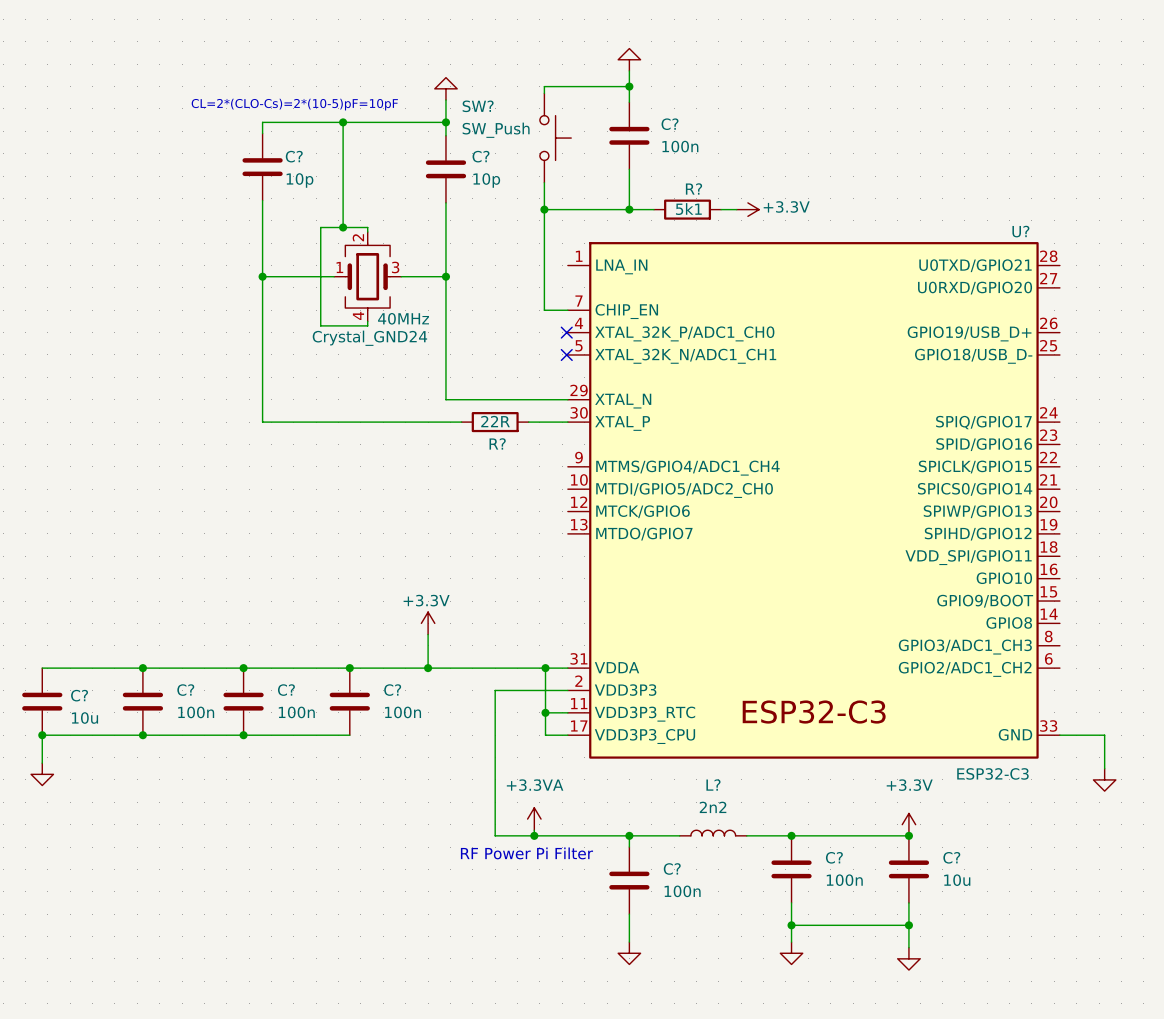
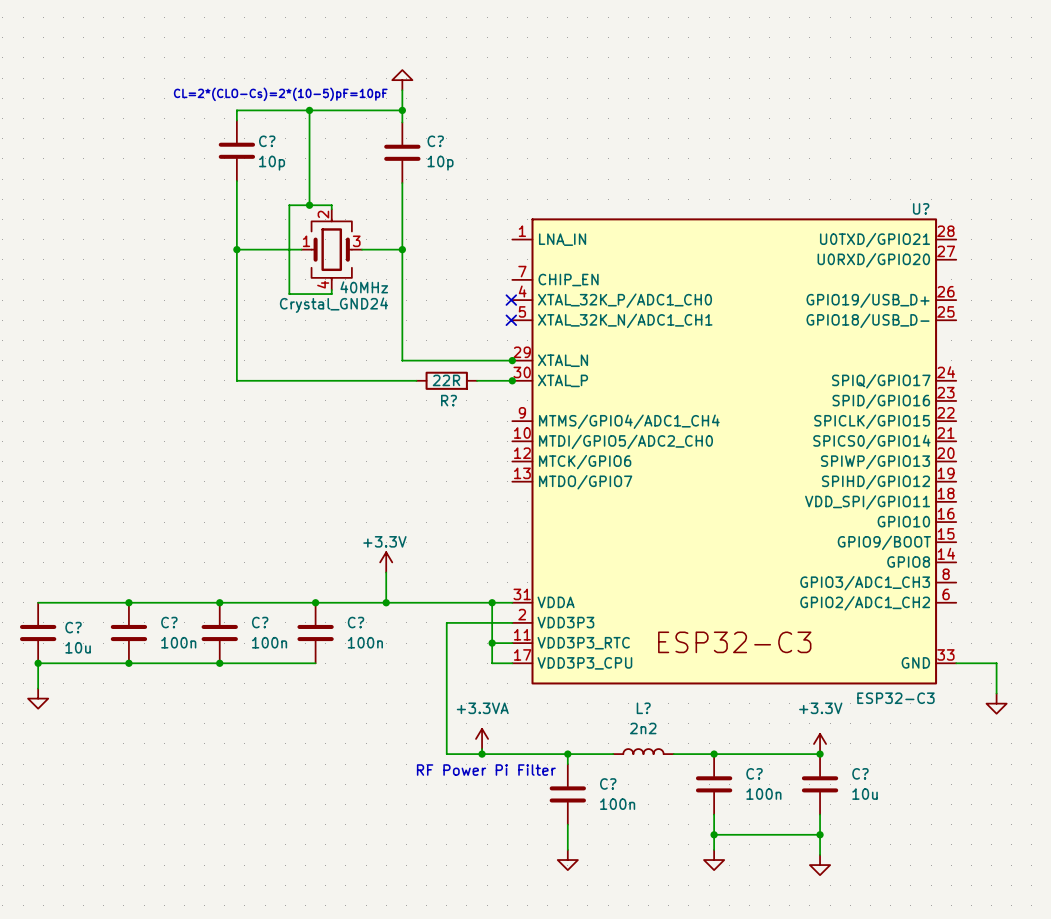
power symbol: (629, 59) -> none
wire: (629, 70) (629, 102) -> none
wire: (629, 86) (544, 86) (544, 93) -> none
junction: (629, 86) -> none
C?: 100n (629, 135) -> none
SW?: SW_Push (555, 138) -> none
wire: (629, 169) (629, 209) -> none
wire: (544, 182) (544, 310) (567, 310) -> none
wire: (544, 209) (653, 209) -> none
junction: (544, 209) -> none
junction: (629, 209) -> none
R?: 5k1 (687, 209) -> none
wire: (721, 209) (736, 209) -> none
power symbol: +3.3V (747, 209) -> none
junction: none -> (512, 360)
junction: none -> (512, 380)

